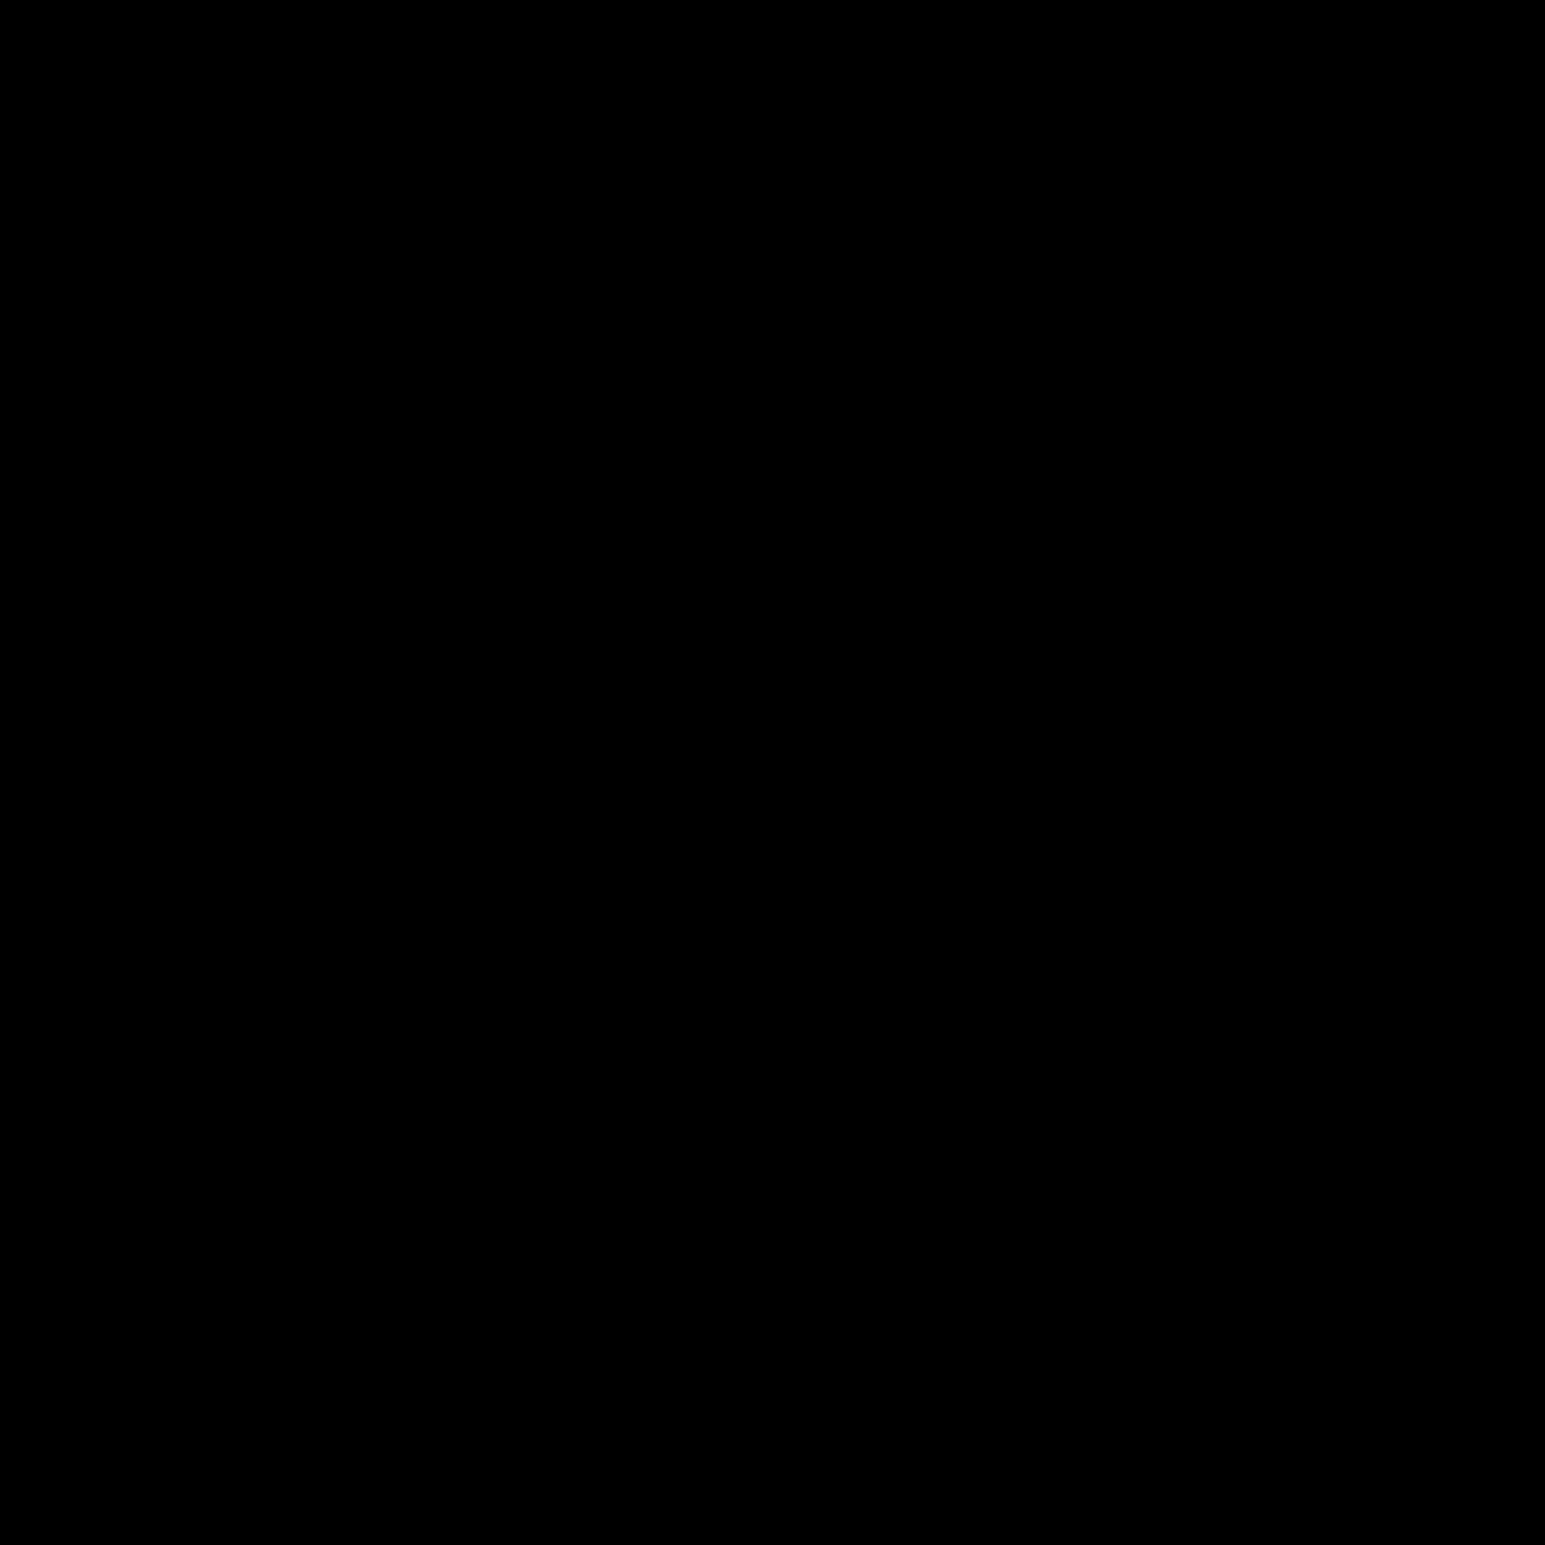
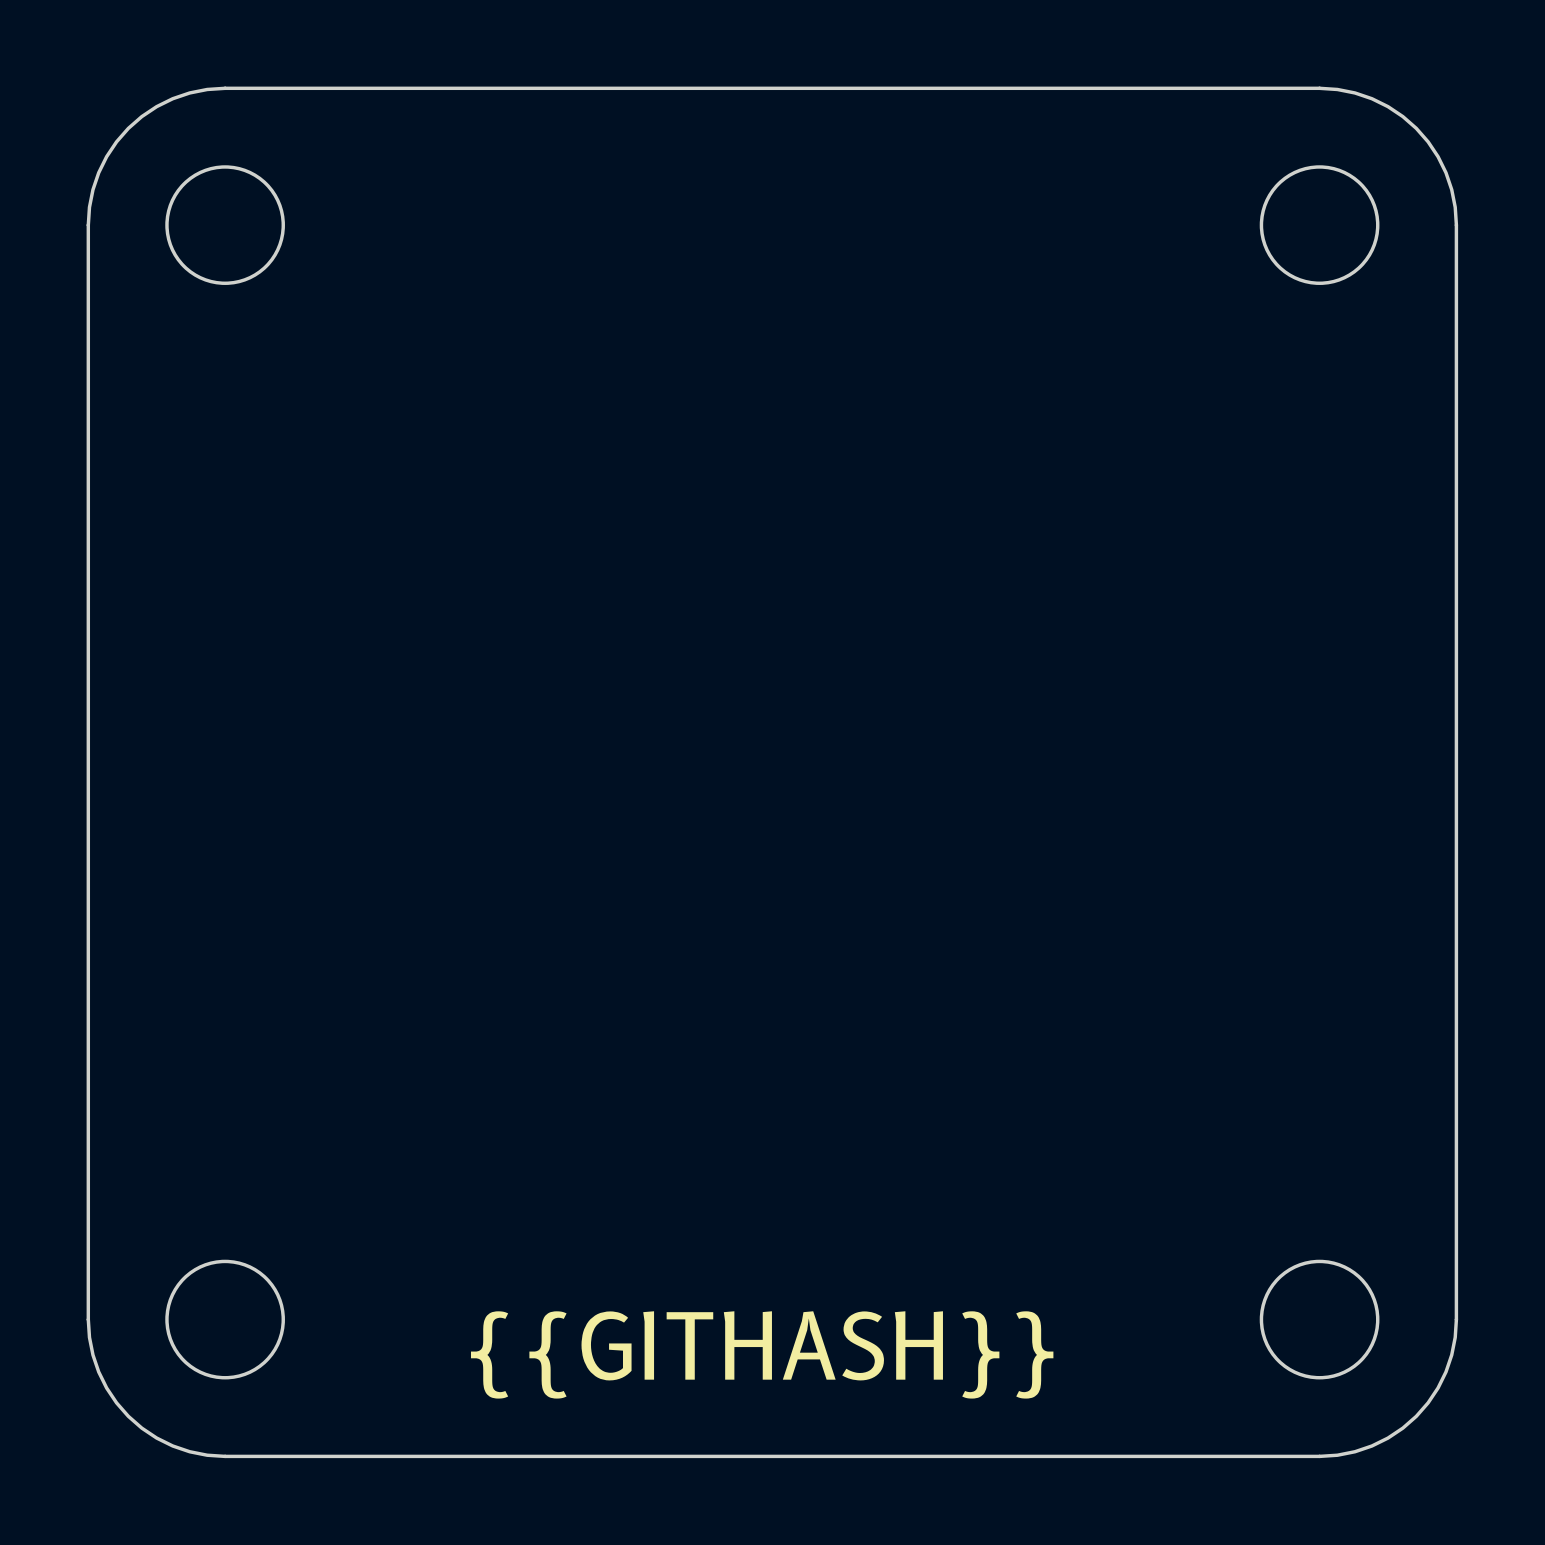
board edge: none -> (225, 88) (1319, 88) (1354, 92) (1371, 98) (1402, 116) (1416, 128) (1428, 141) (1445, 172) (1451, 189) (1456, 225) (1456, 1319) (1455, 1337) (1445, 1371) (1428, 1402) (1416, 1416) (1402, 1428) (1371, 1445) (1354, 1451) (1319, 1456) (225, 1456) (207, 1455) (172, 1445) (141, 1428) (128, 1416) (106, 1387) (98, 1371) (89, 1337) (88, 1319) (89, 207) (98, 172) (106, 156) (128, 128) (141, 116) (172, 98) (189, 92) (225, 88)
round board edge: none -> [165, 165, 285, 285]
round board edge: none -> [1259, 165, 1380, 285]
round board edge: none -> [165, 1259, 285, 1380]
round board edge: none -> [1259, 1259, 1380, 1380]
text: none -> {{GITHASH}} (762, 1354)

